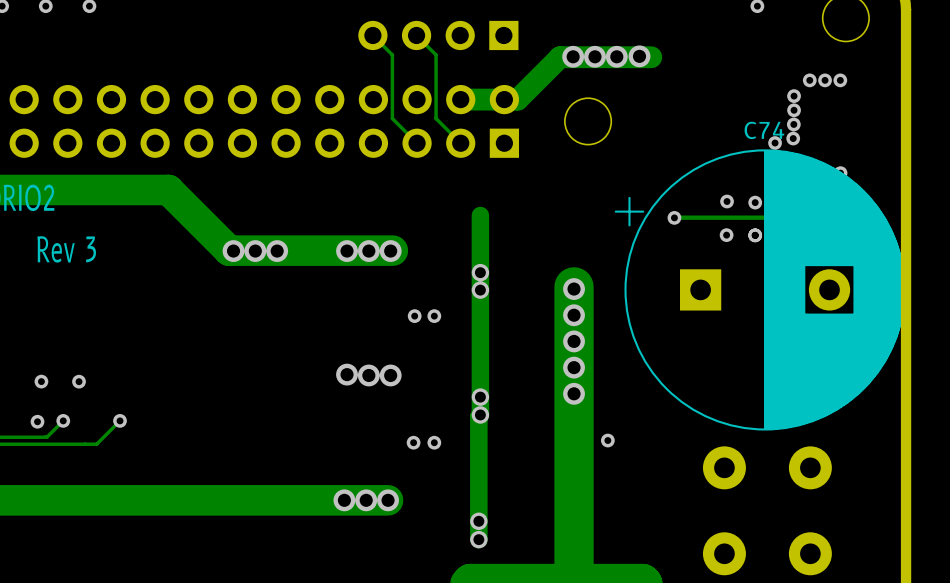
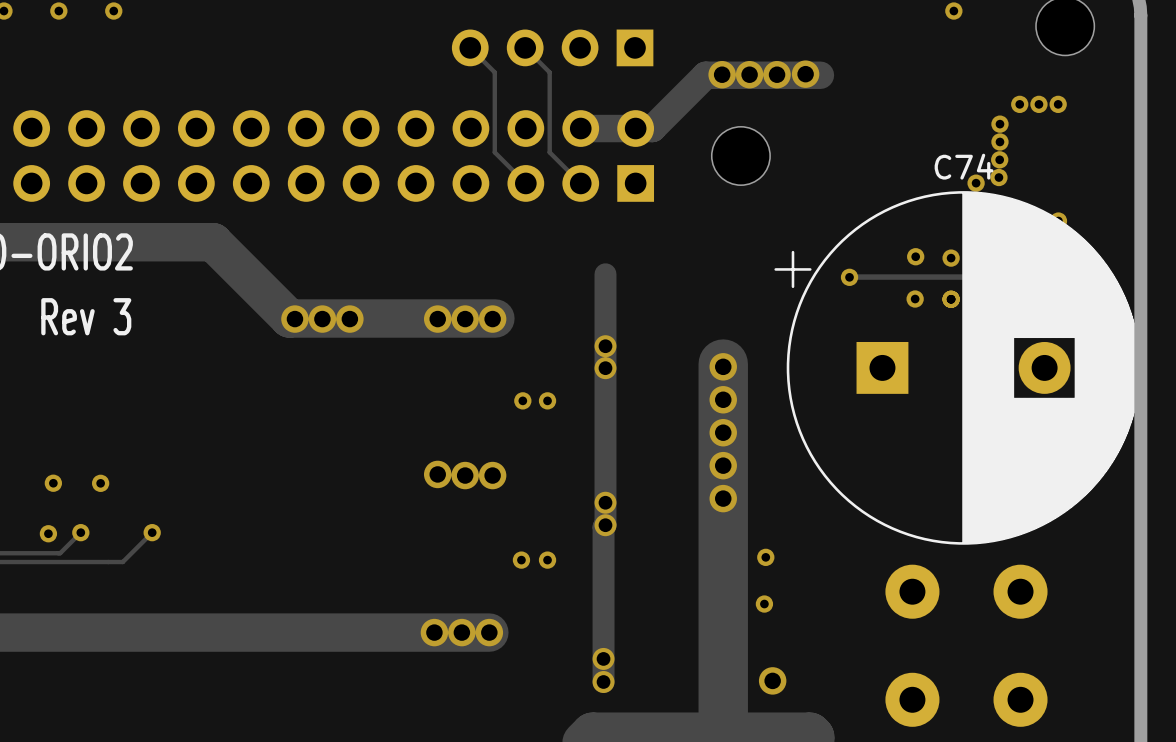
via: none -> (764, 604)
via: none -> (772, 680)

